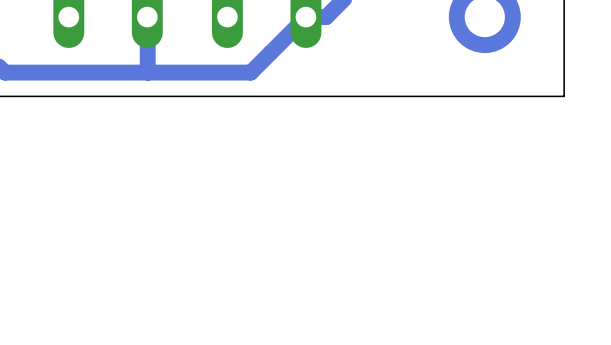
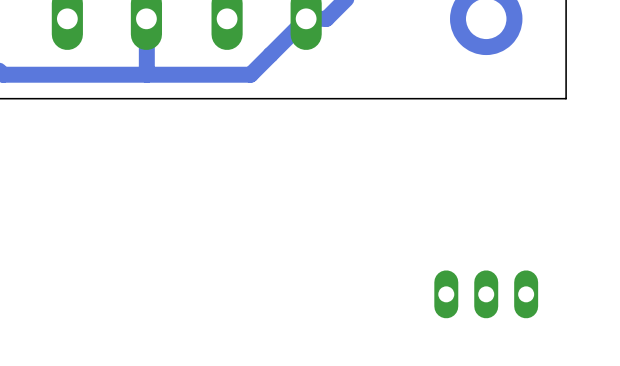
part: none -> (486, 294)

